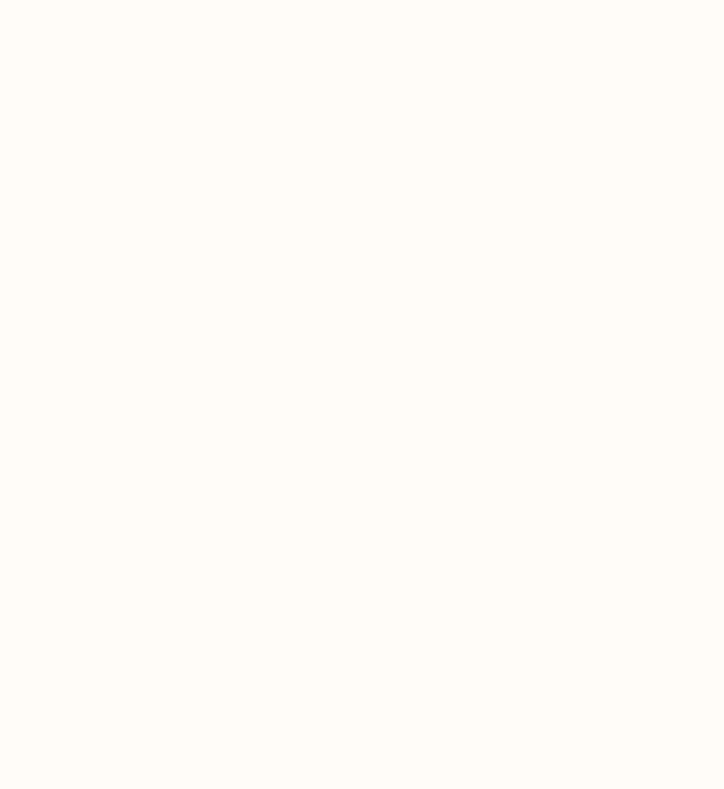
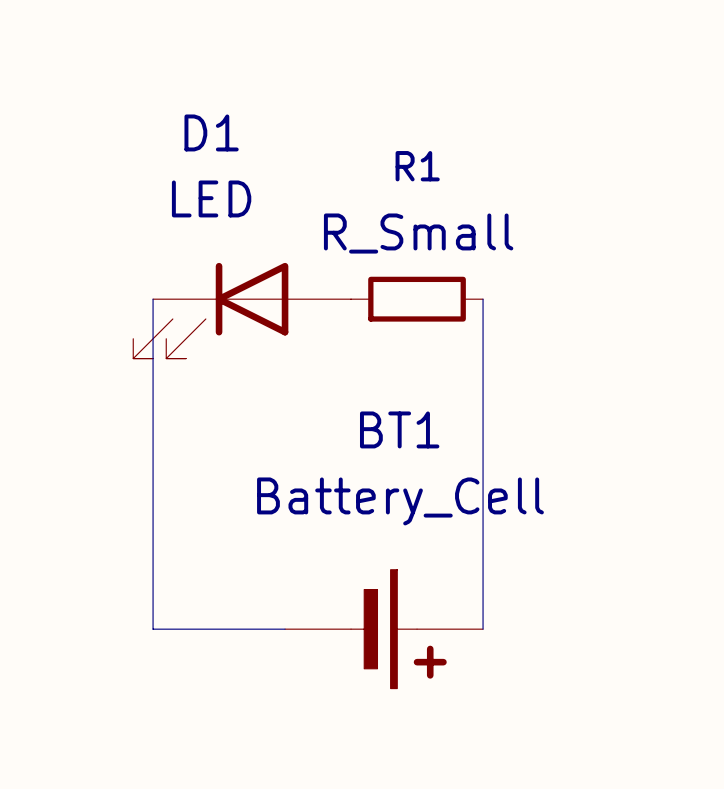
wire: none -> (153, 299) (153, 629) (285, 629)
R1: none -> R_Small (417, 299)
wire: none -> (483, 299) (483, 629)
D1: none -> LED (242, 310)
BT1: none -> Battery_Cell (384, 629)

